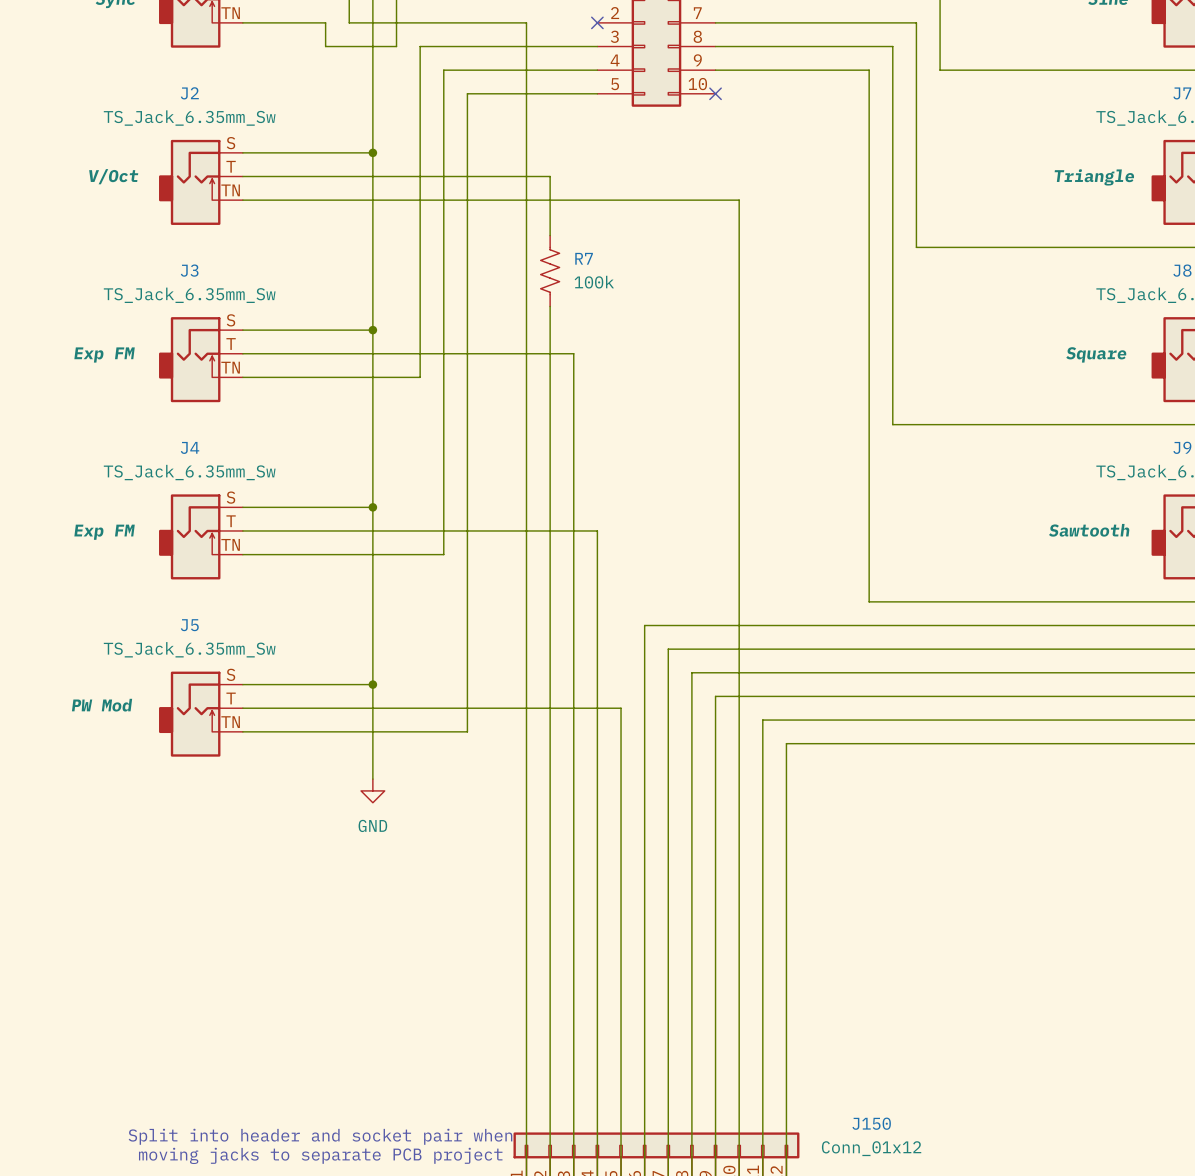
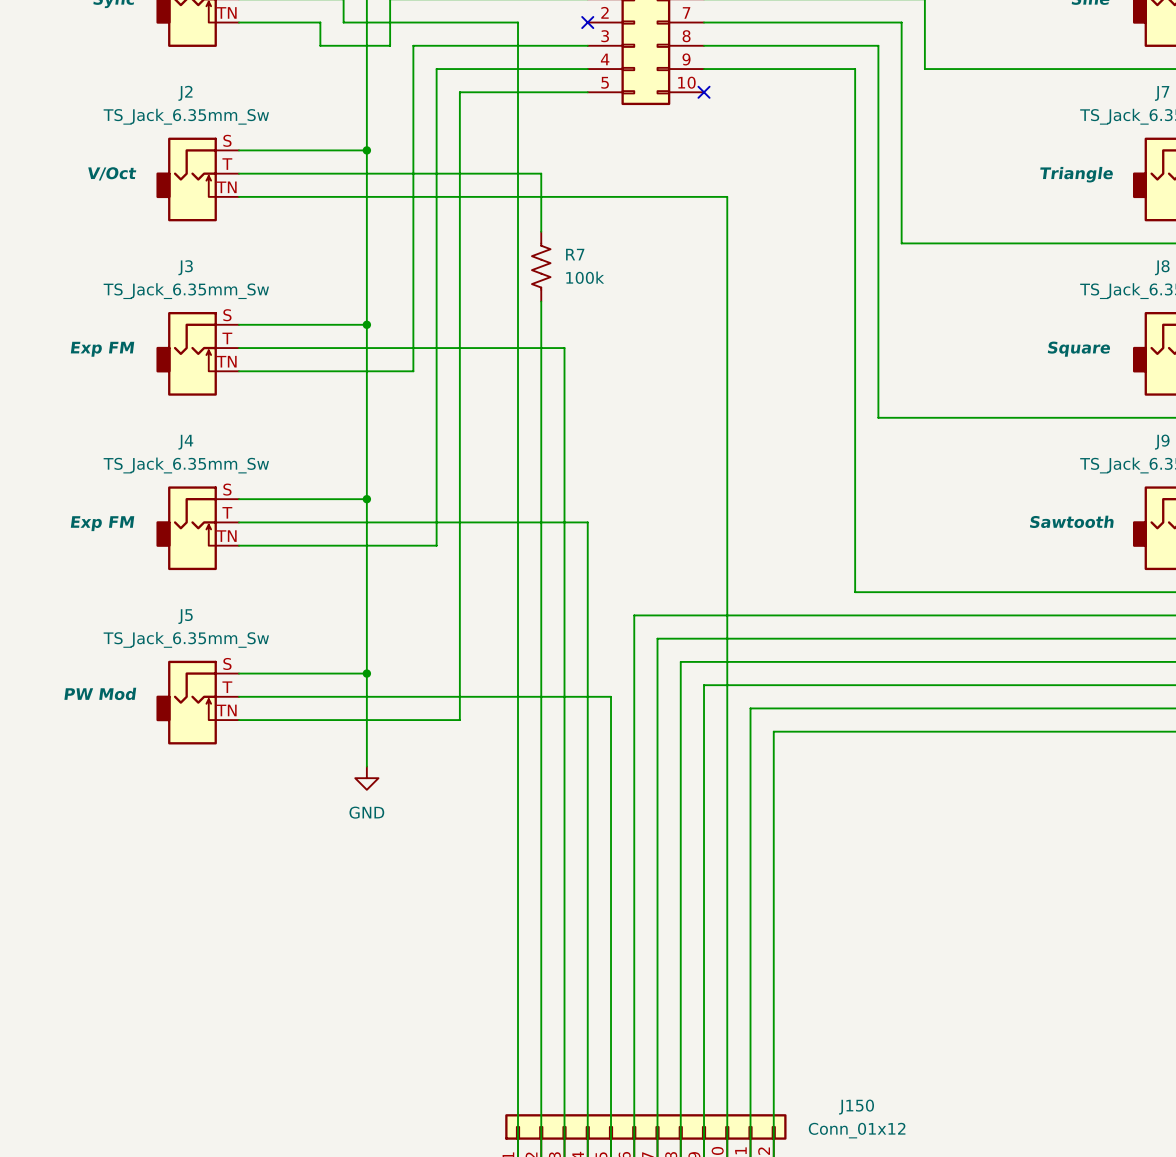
text: Split into header and socket pair when (320, 1136) -> none
text: moving jacks to separate PCB project (320, 1155) -> none

